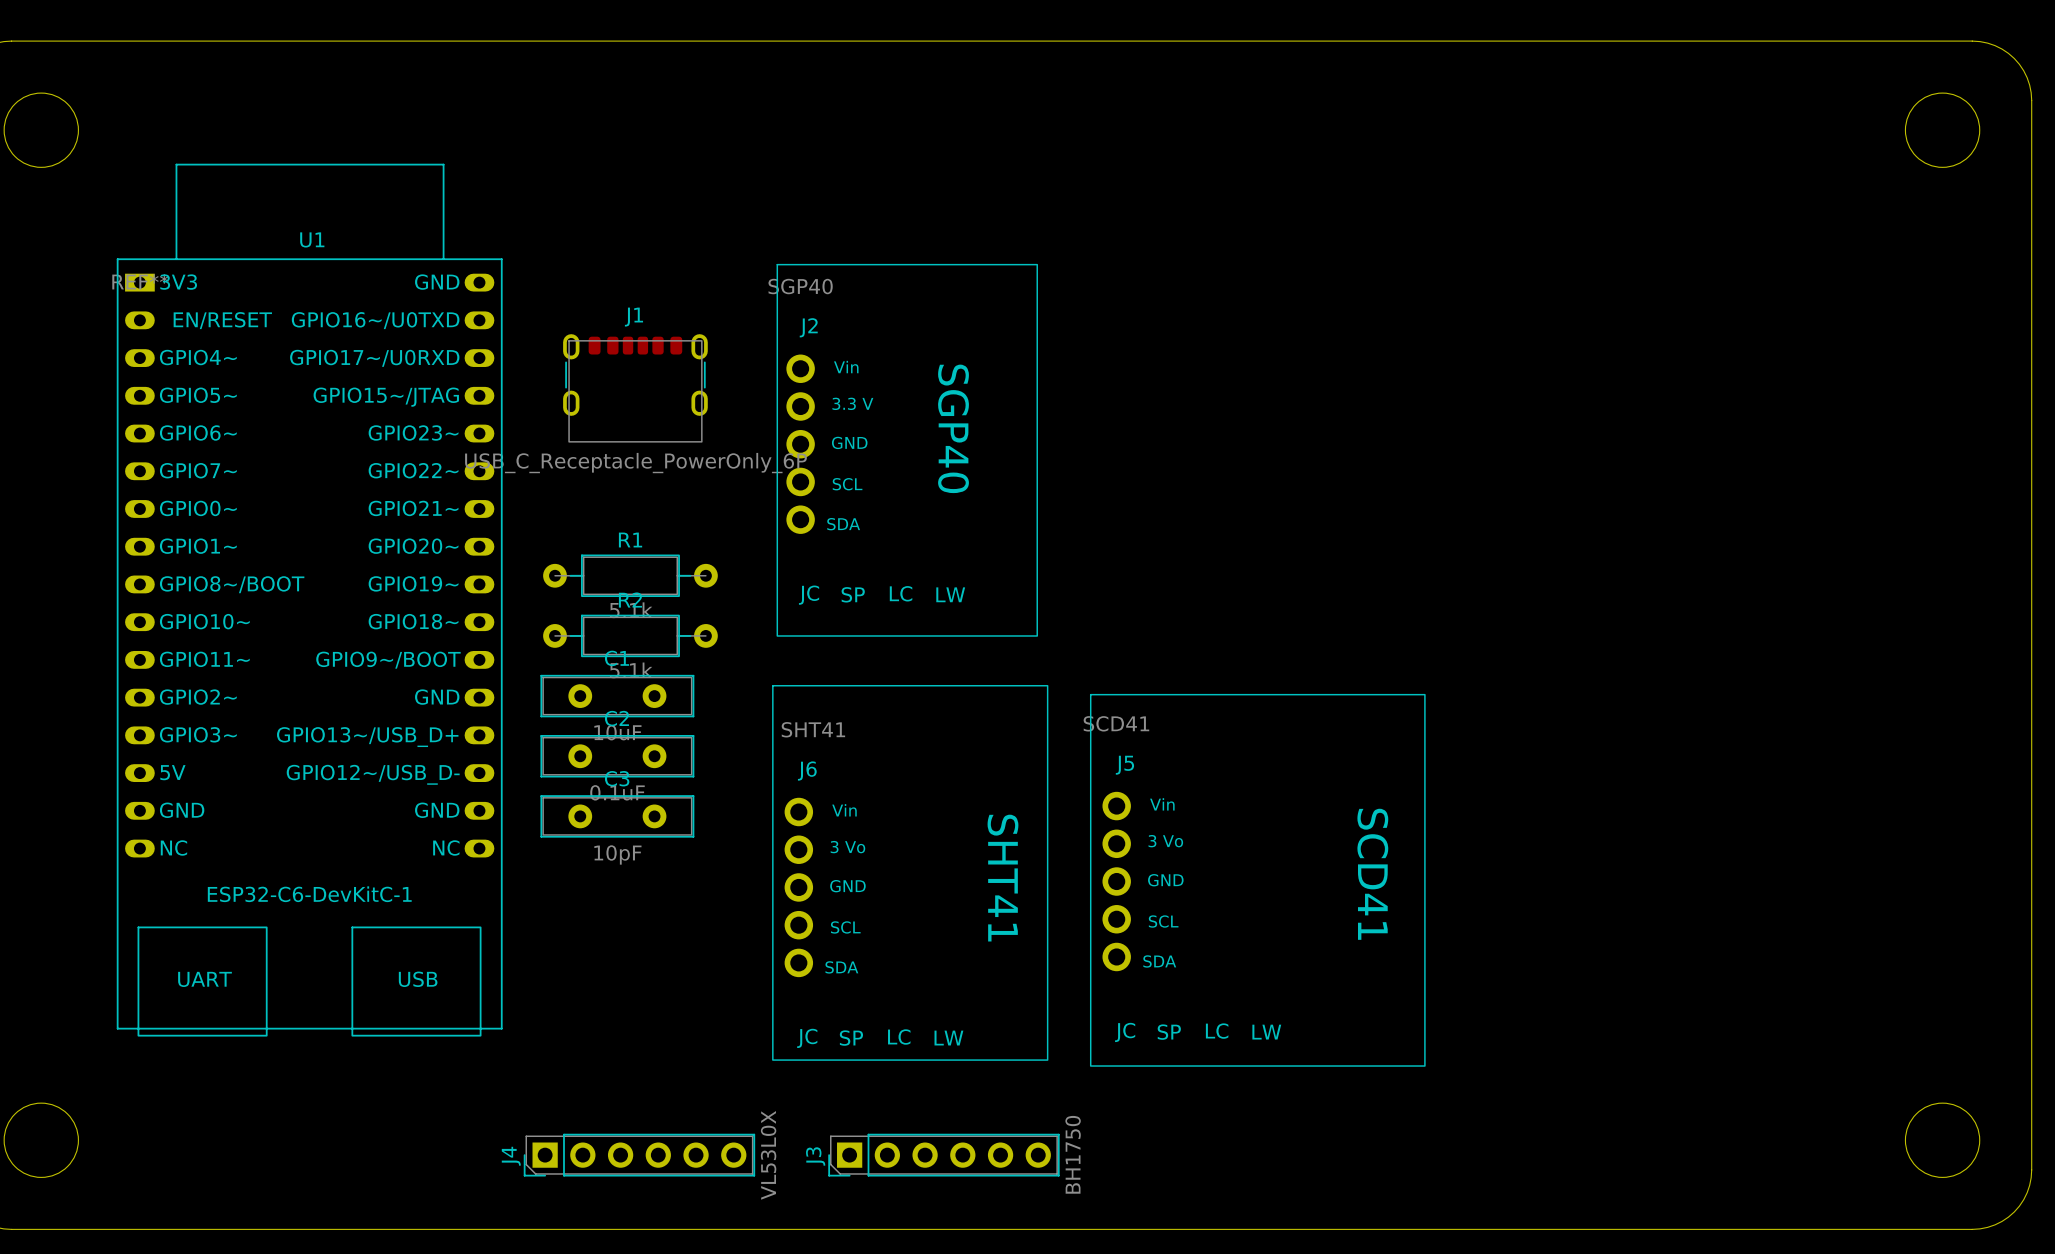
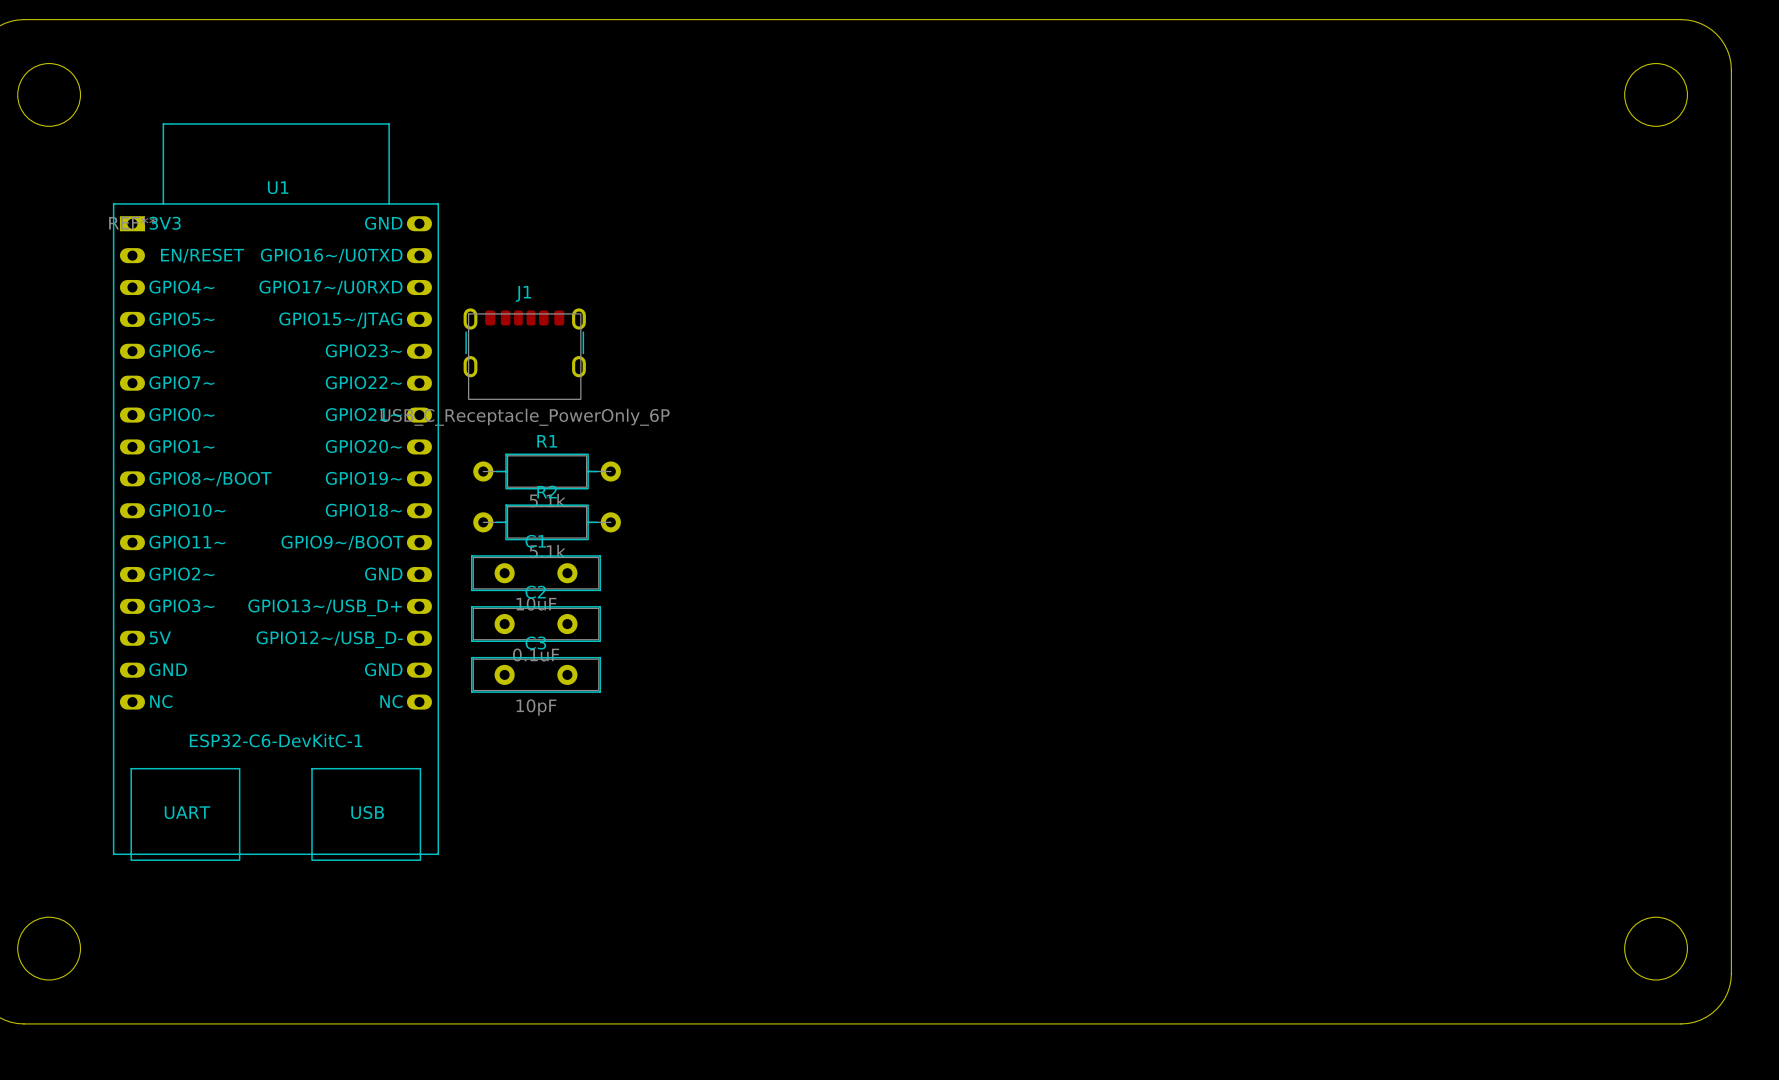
J1 position: (635, 388) -> (524, 354)
J2: SGP40 (907, 450) -> none
J6: SHT41 (910, 872) -> none
J5: SCD41 (1257, 880) -> none
J4: VL53L0X (639, 1155) -> none
J3: BH1750 (943, 1155) -> none

